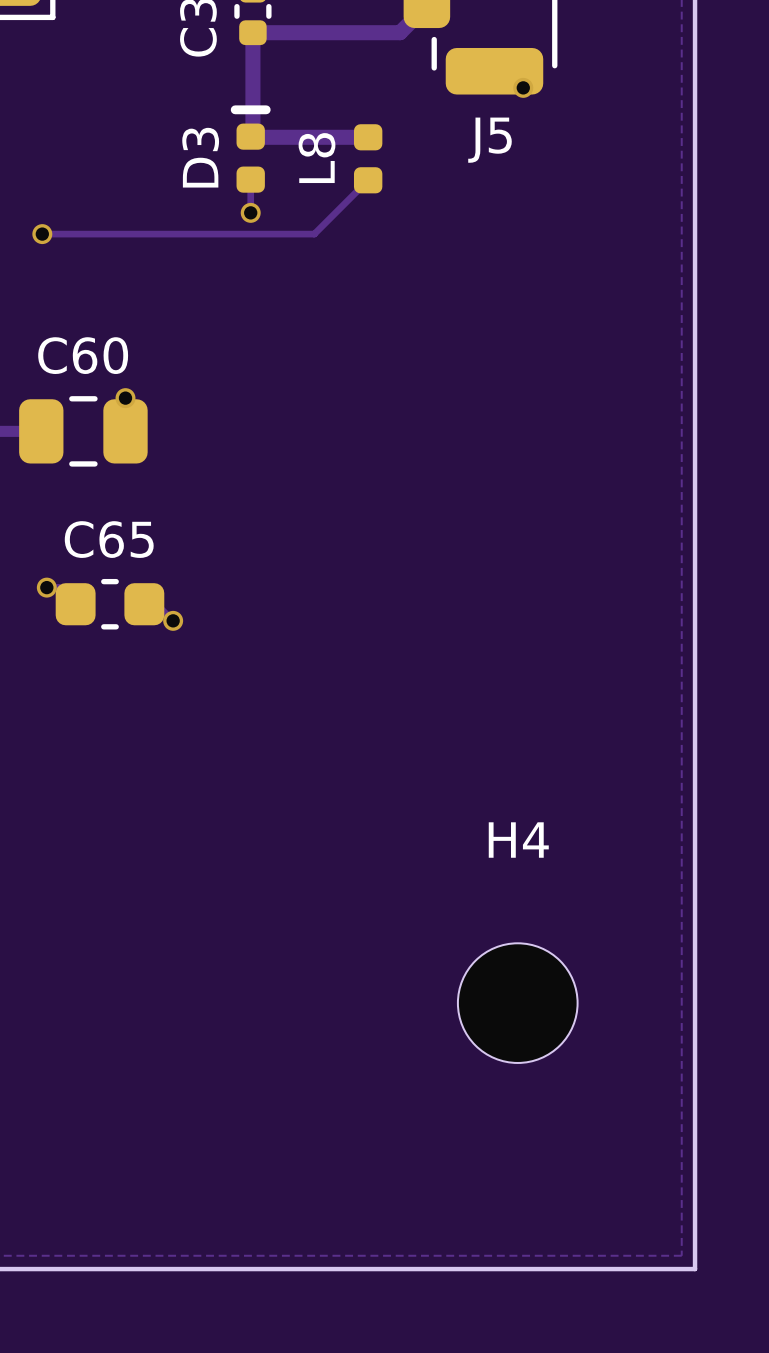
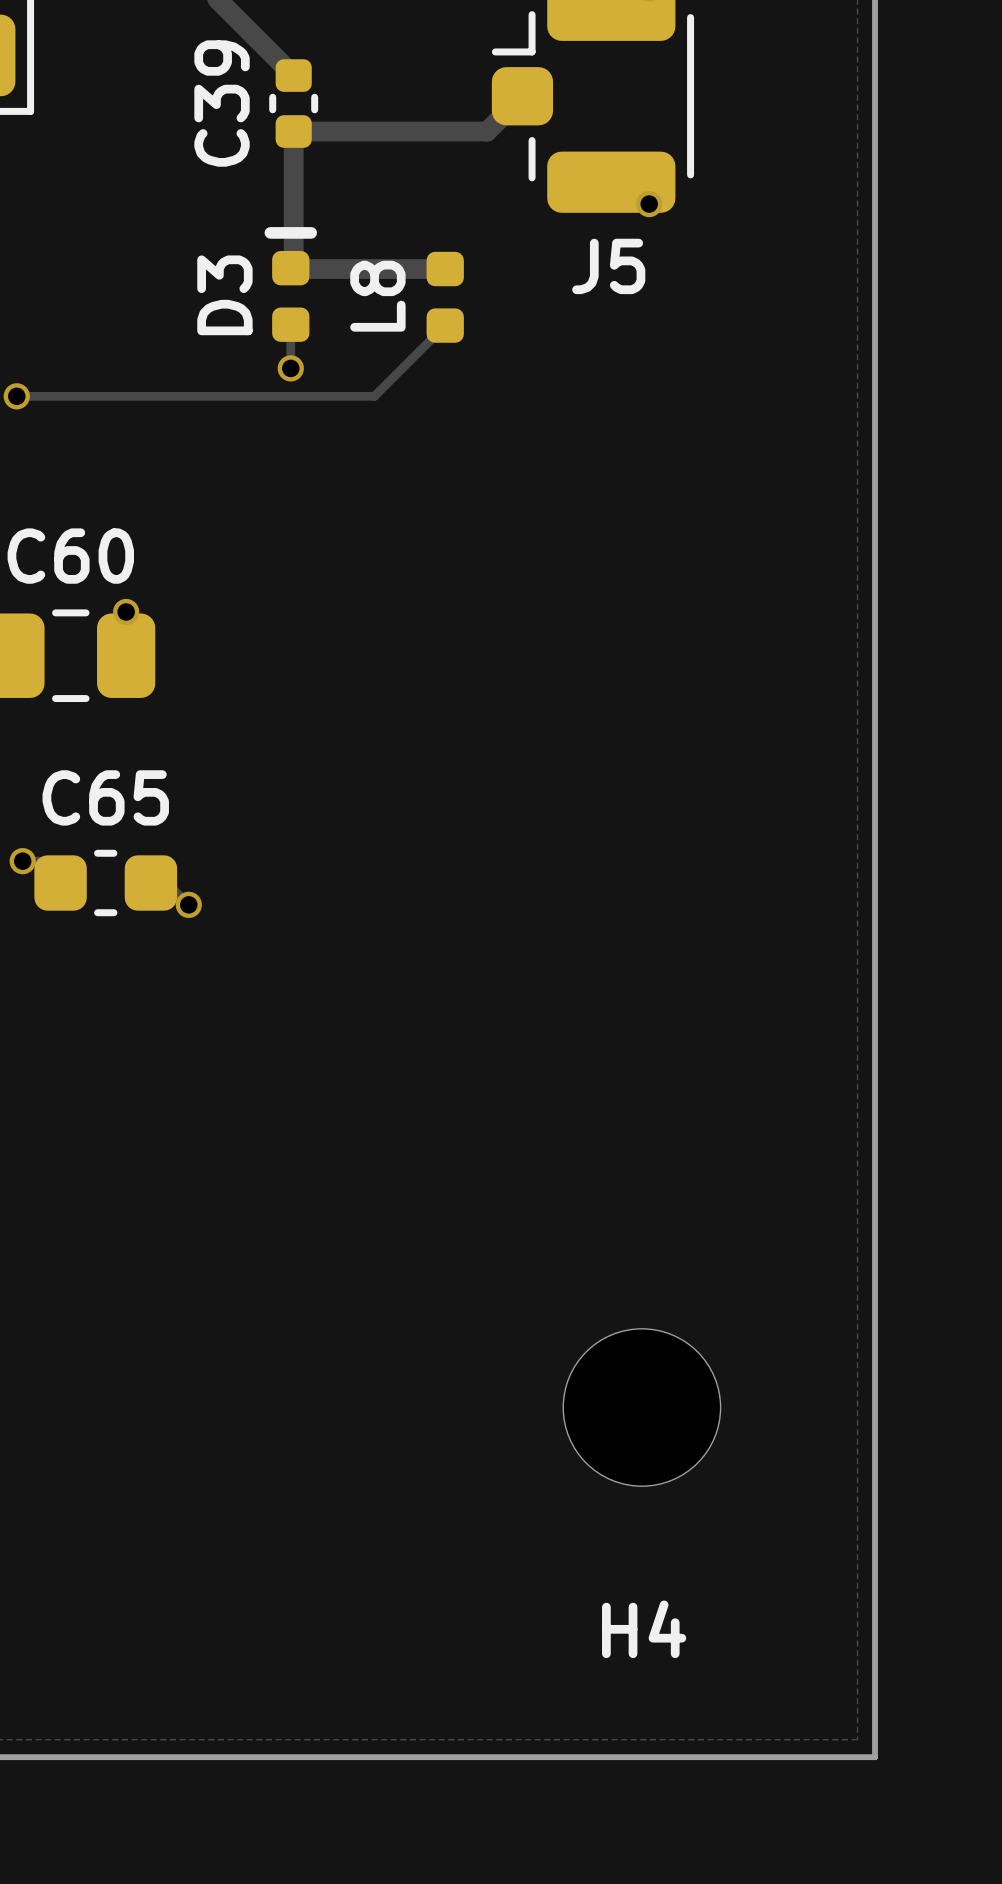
H4 name position: H4 (518, 840) -> H4 (644, 1629)

